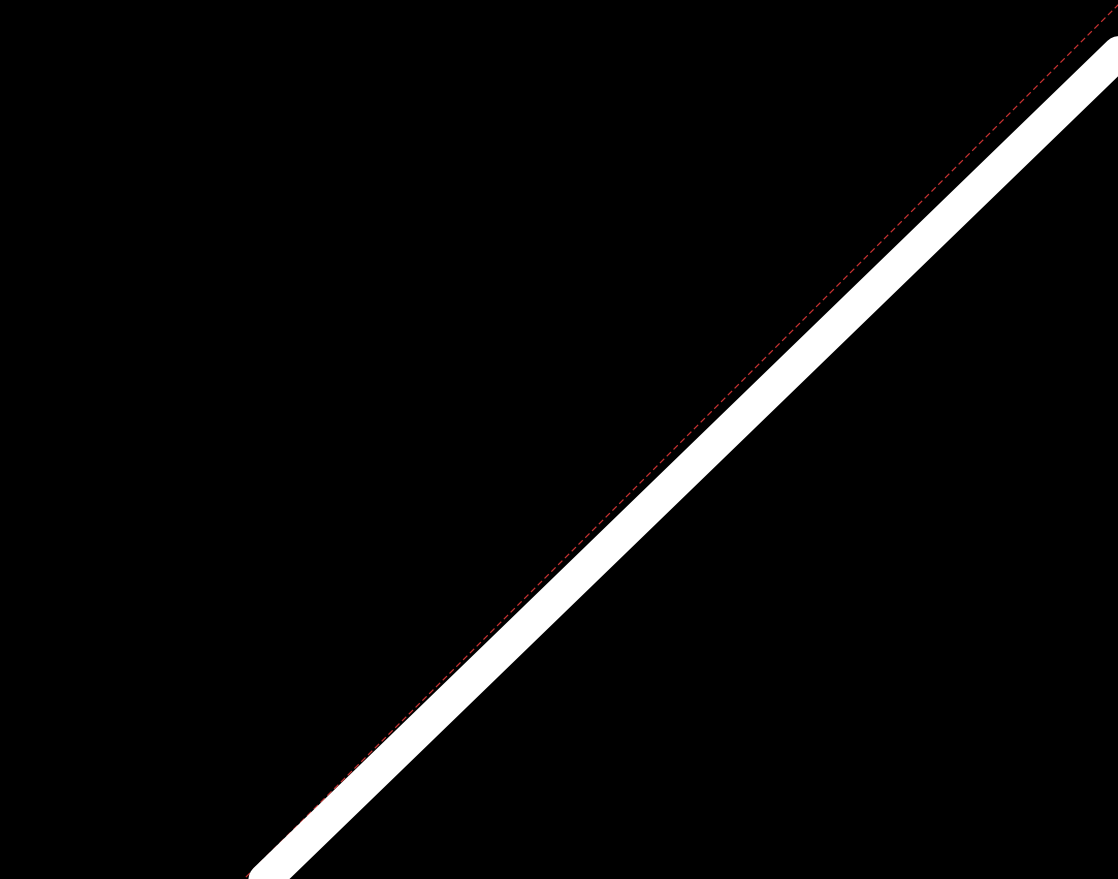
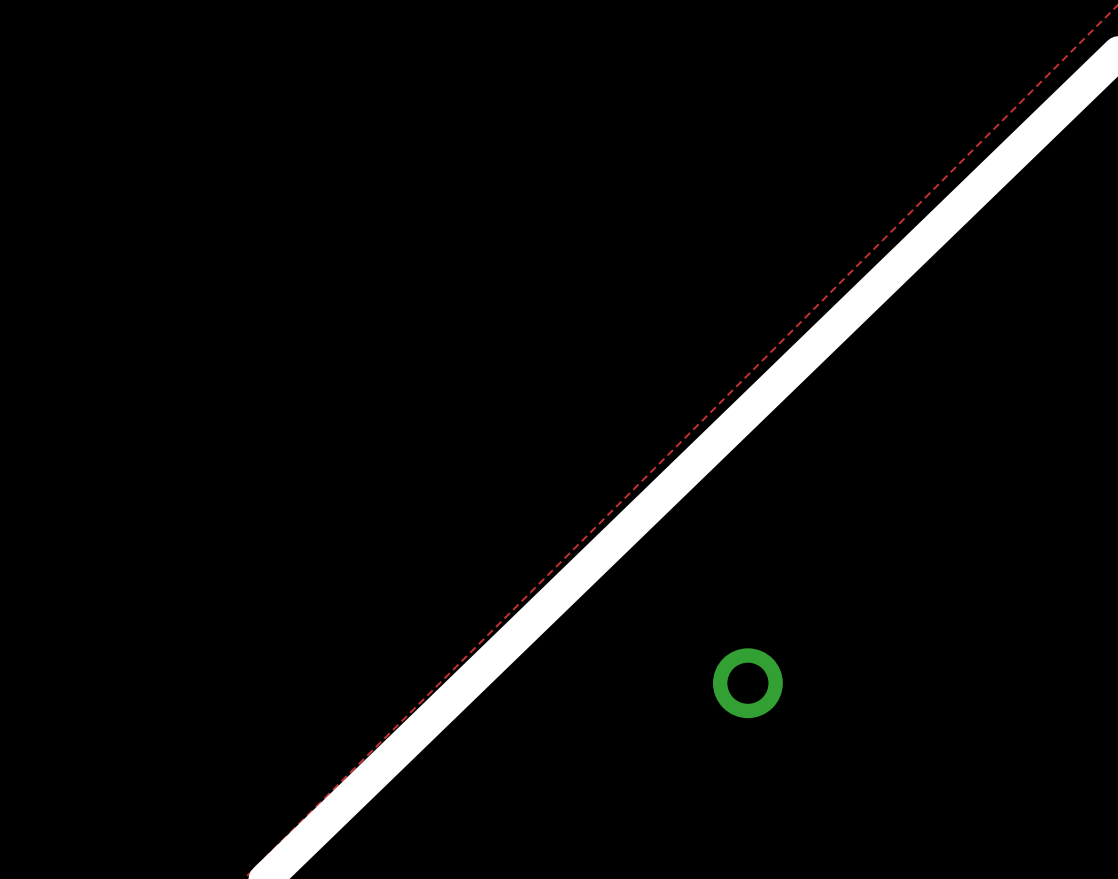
via: none -> (747, 683)

